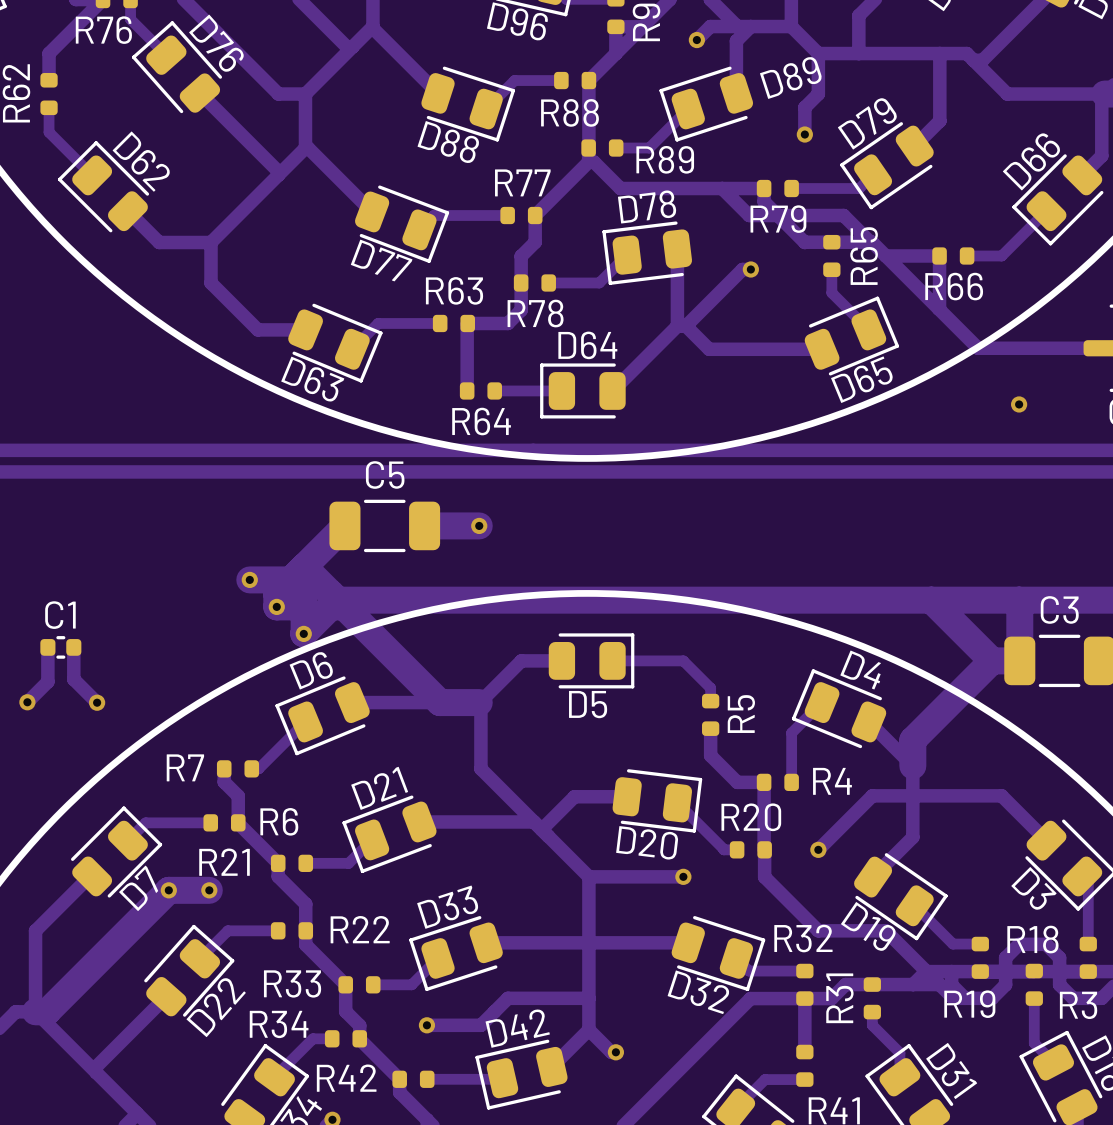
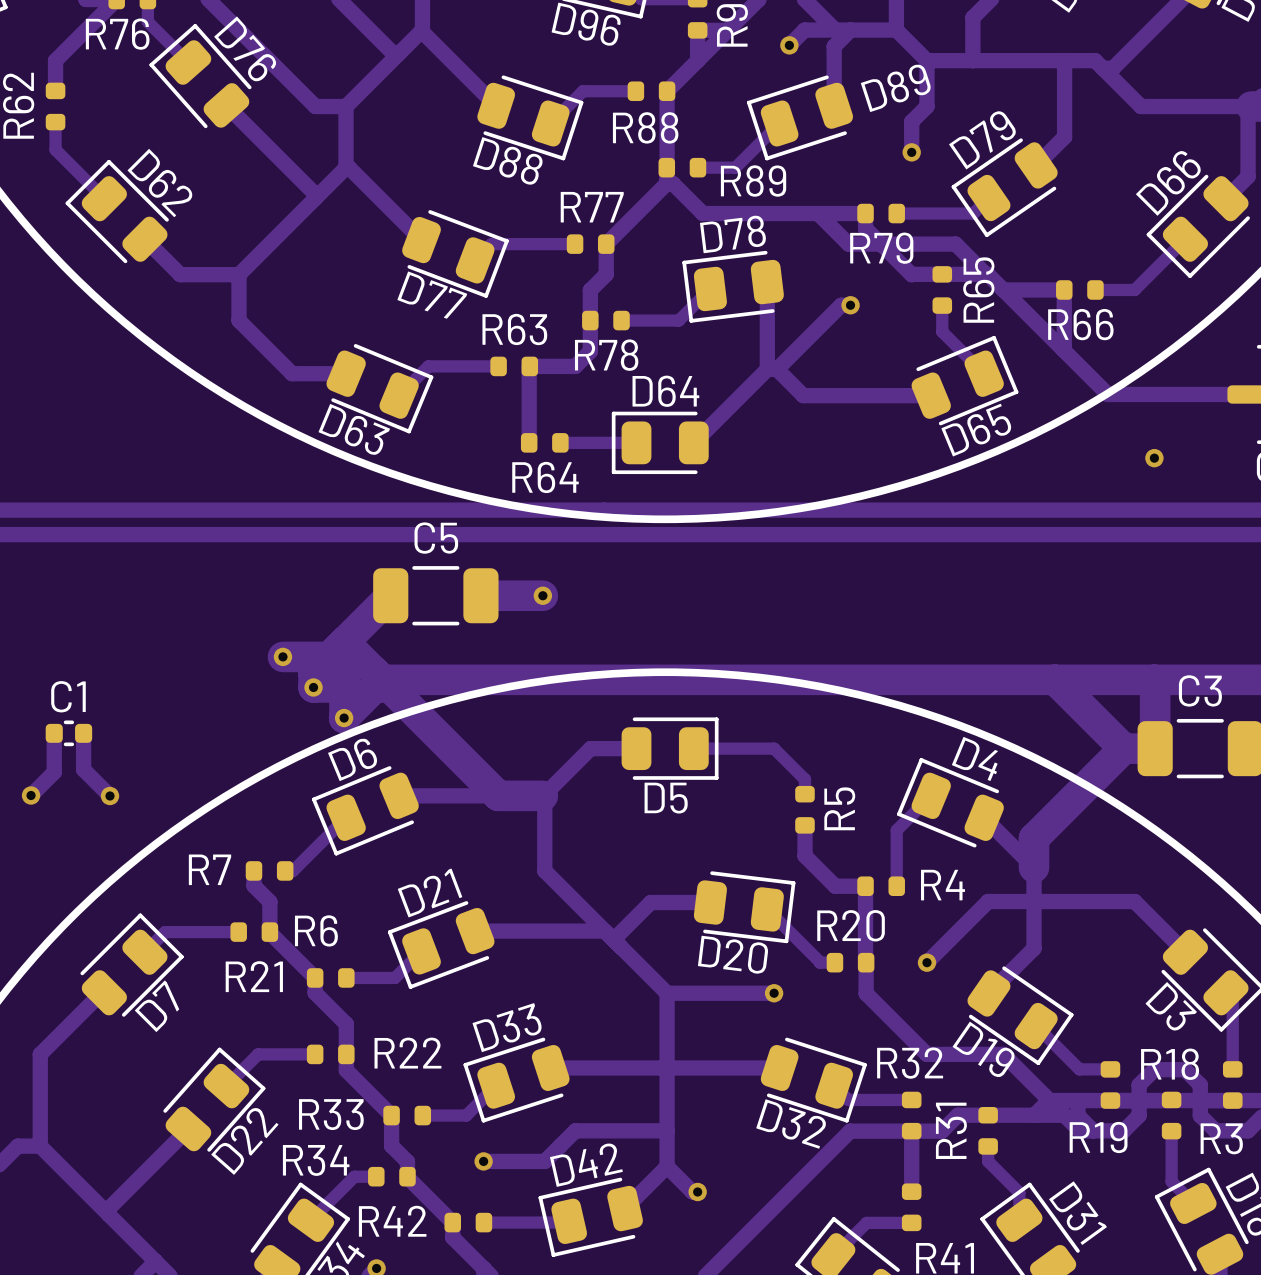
via: (168, 890) -> none
track: (209, 890) (168, 890) (47, 1011) (35, 1011) -> none
via: (209, 890) -> none

